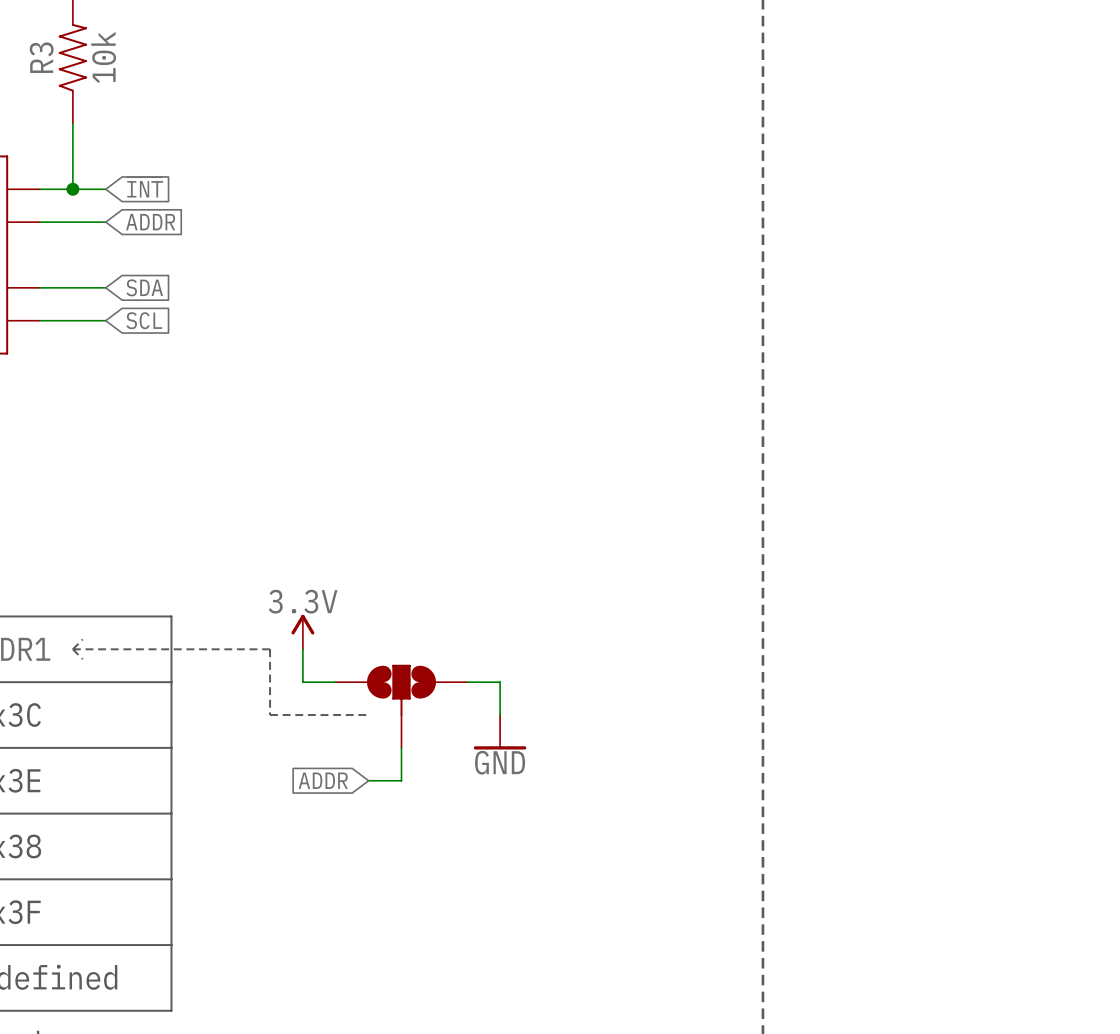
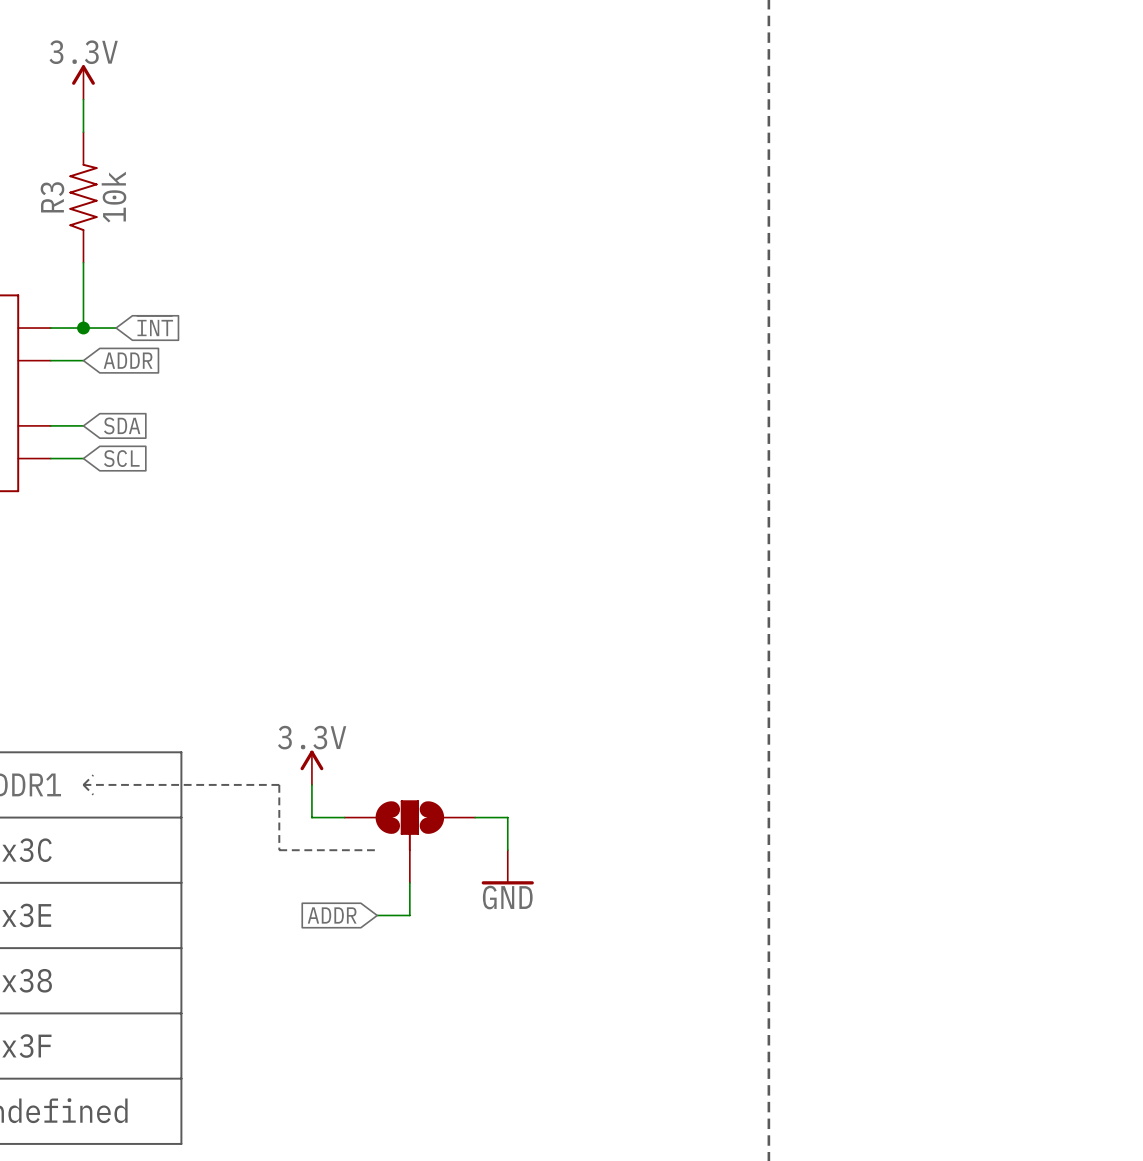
wire: (72, 222) (105, 222) -> none
global label position: ADDR (150, 222) -> ADDR (128, 360)
wire: (72, 287) (105, 287) -> none
global label position: SDA (144, 287) -> SDA (122, 425)
wire: (72, 320) (105, 320) -> none
global label position: SCL (144, 320) -> SCL (121, 458)

